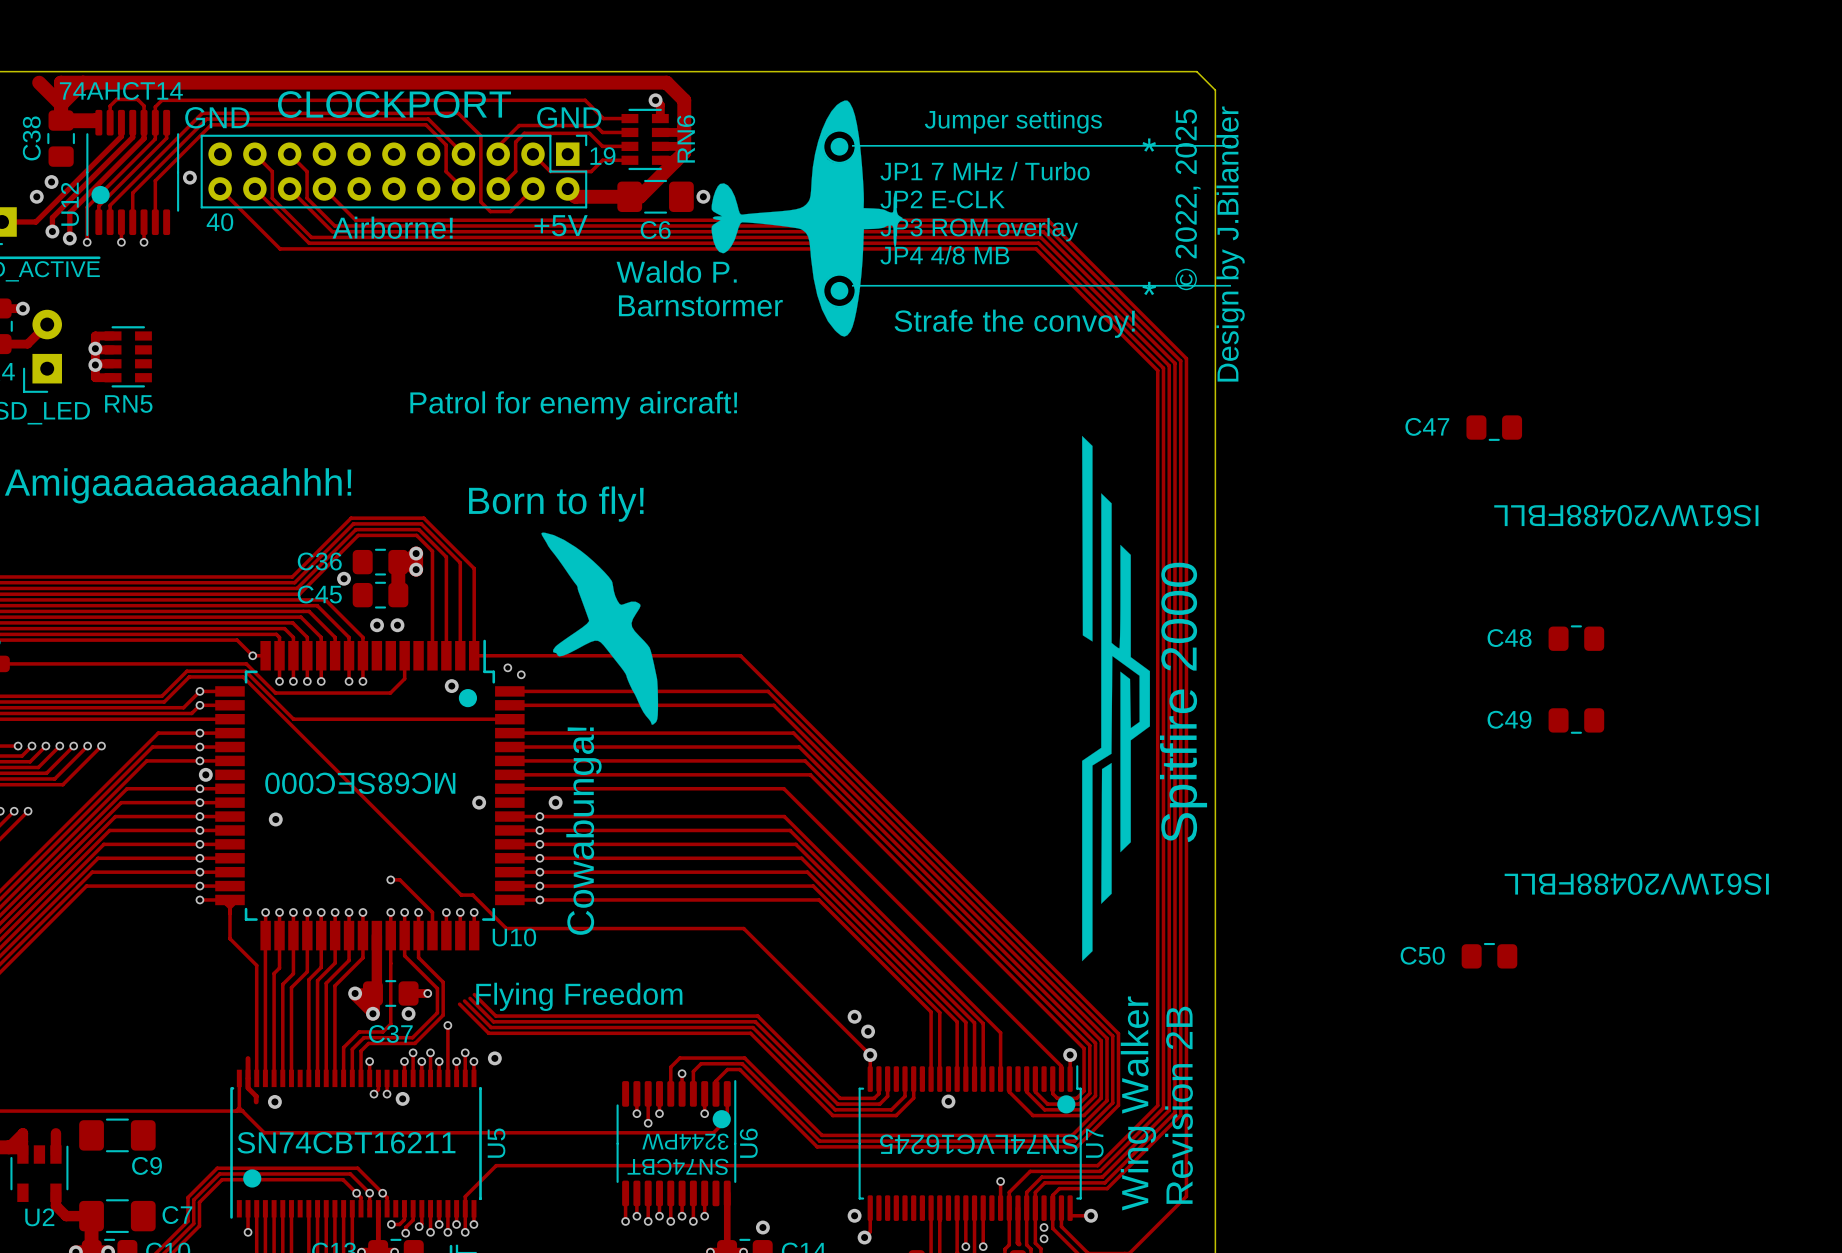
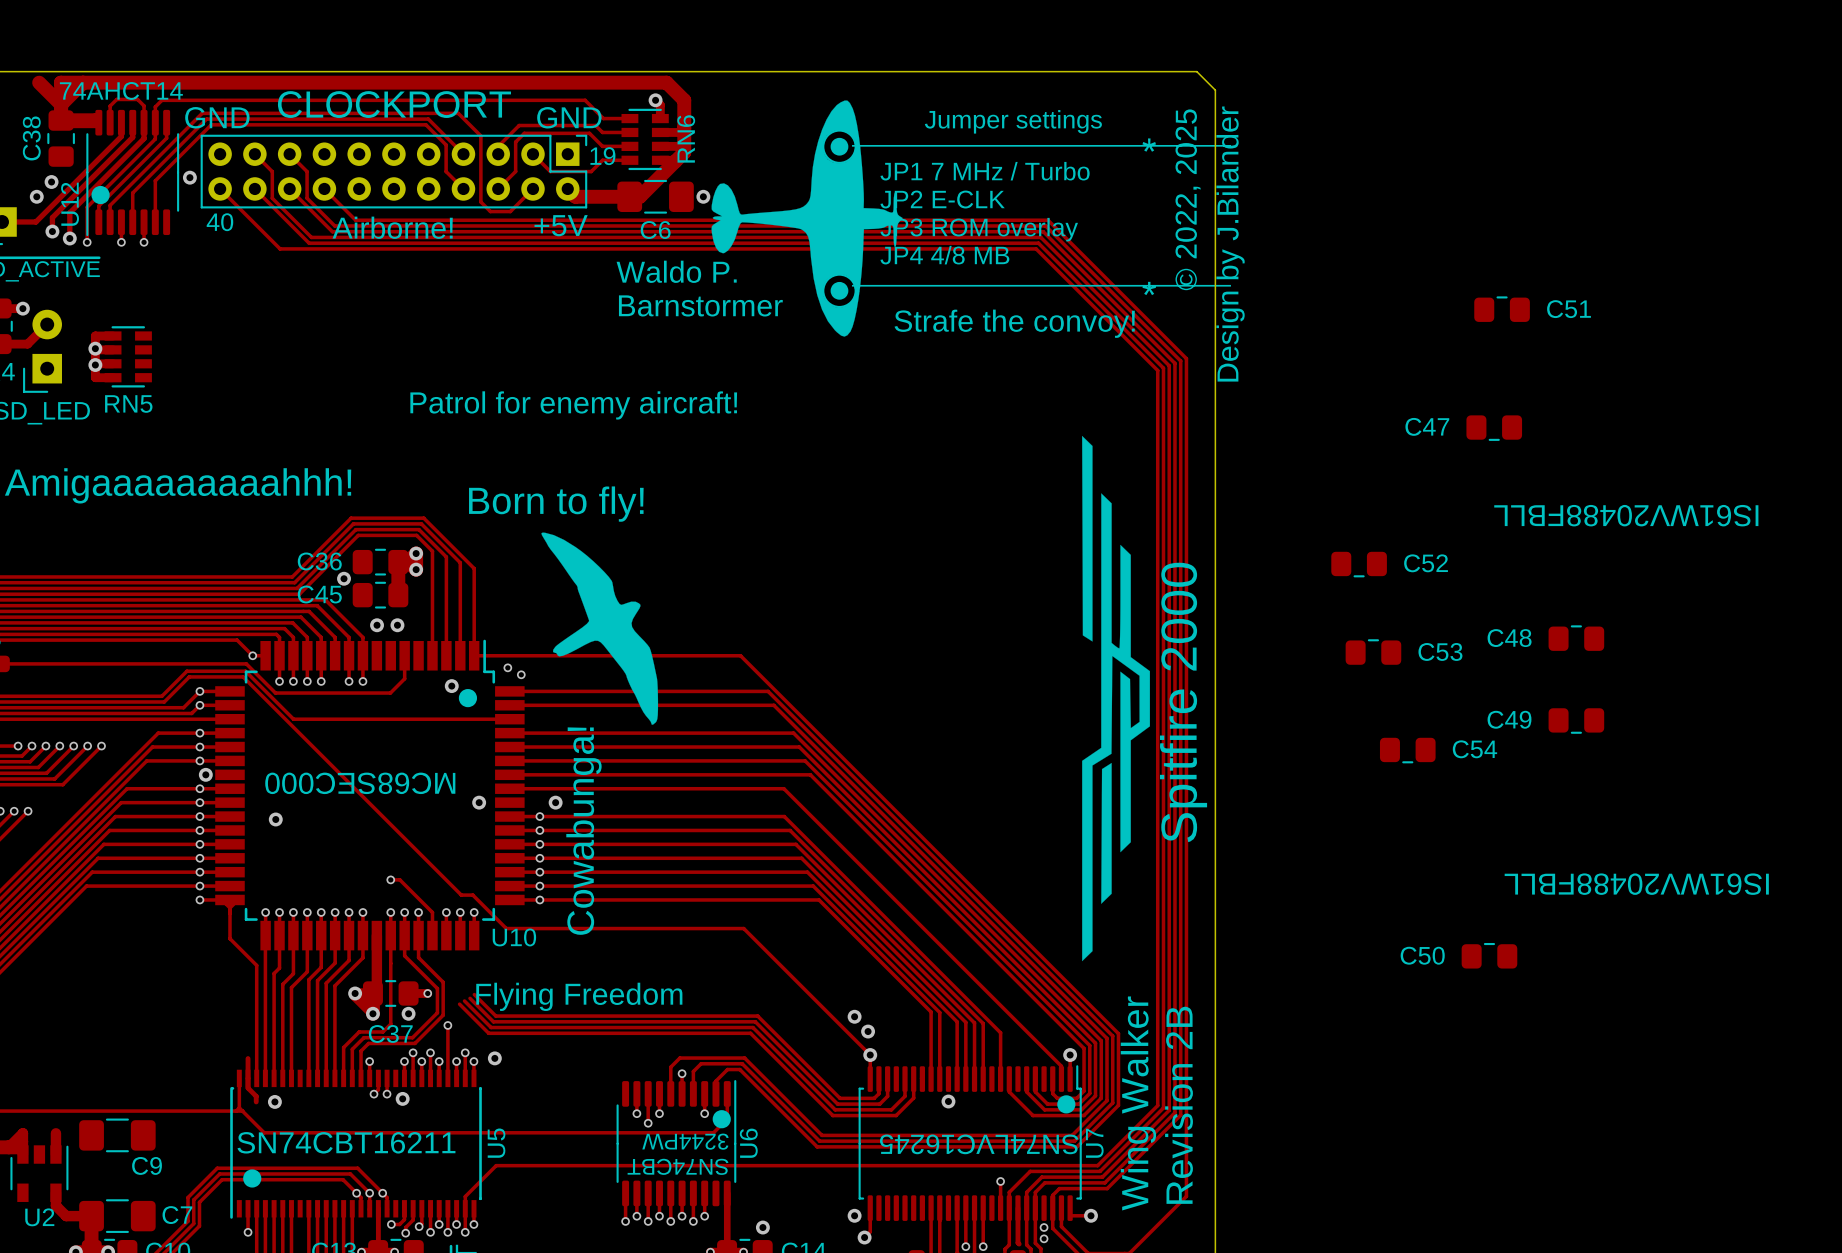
C51: none -> (1502, 309)
C52: none -> (1359, 564)
C53: none -> (1373, 652)
C54: none -> (1407, 750)

